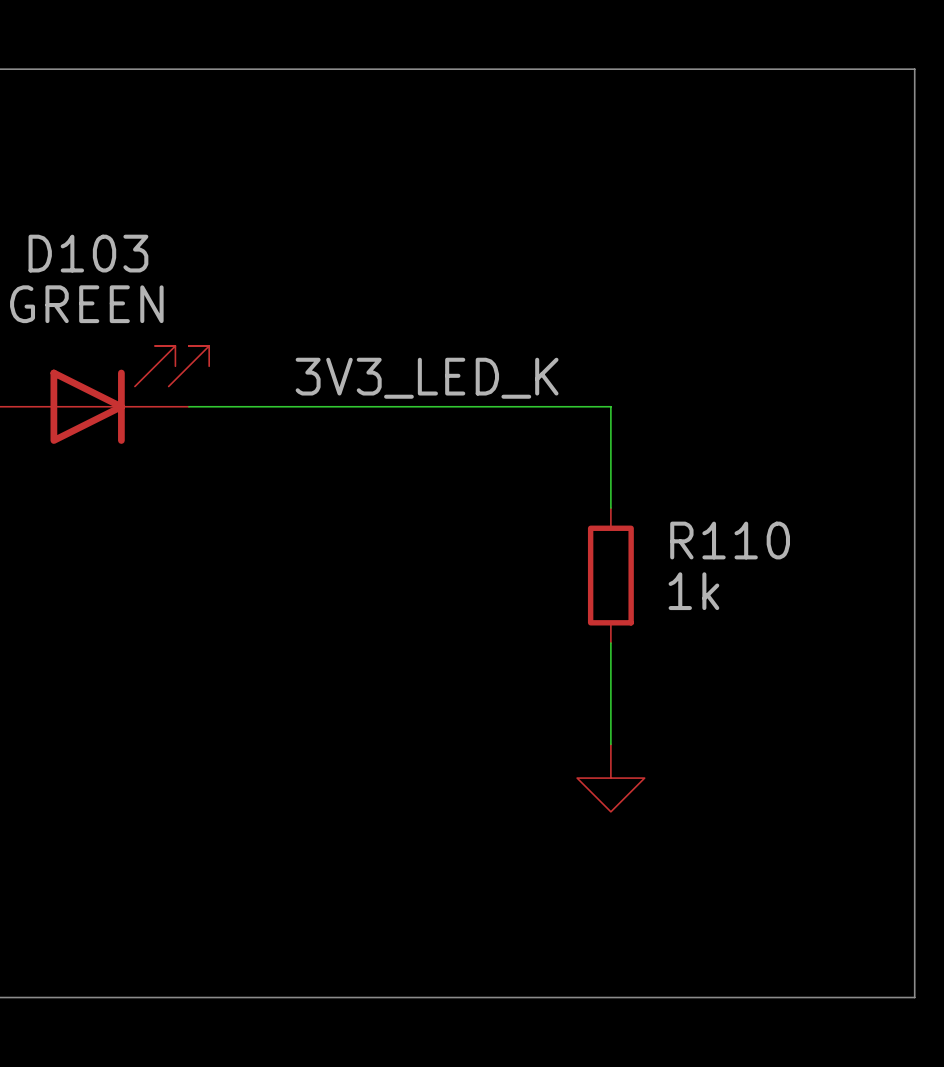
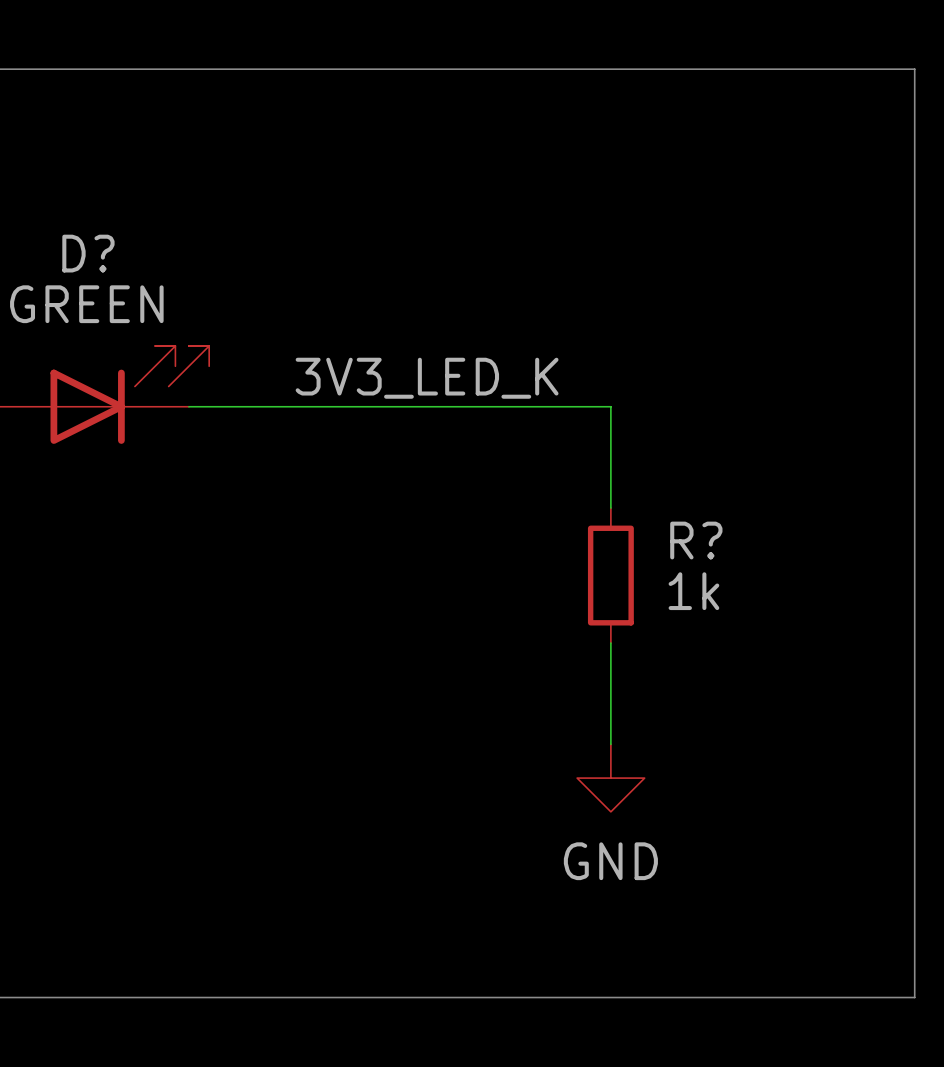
D103 name: D103 (88, 253) -> D? (88, 253)
R110 name: R110 (730, 540) -> R? (696, 540)
power symbol text: none -> GND (610, 861)

